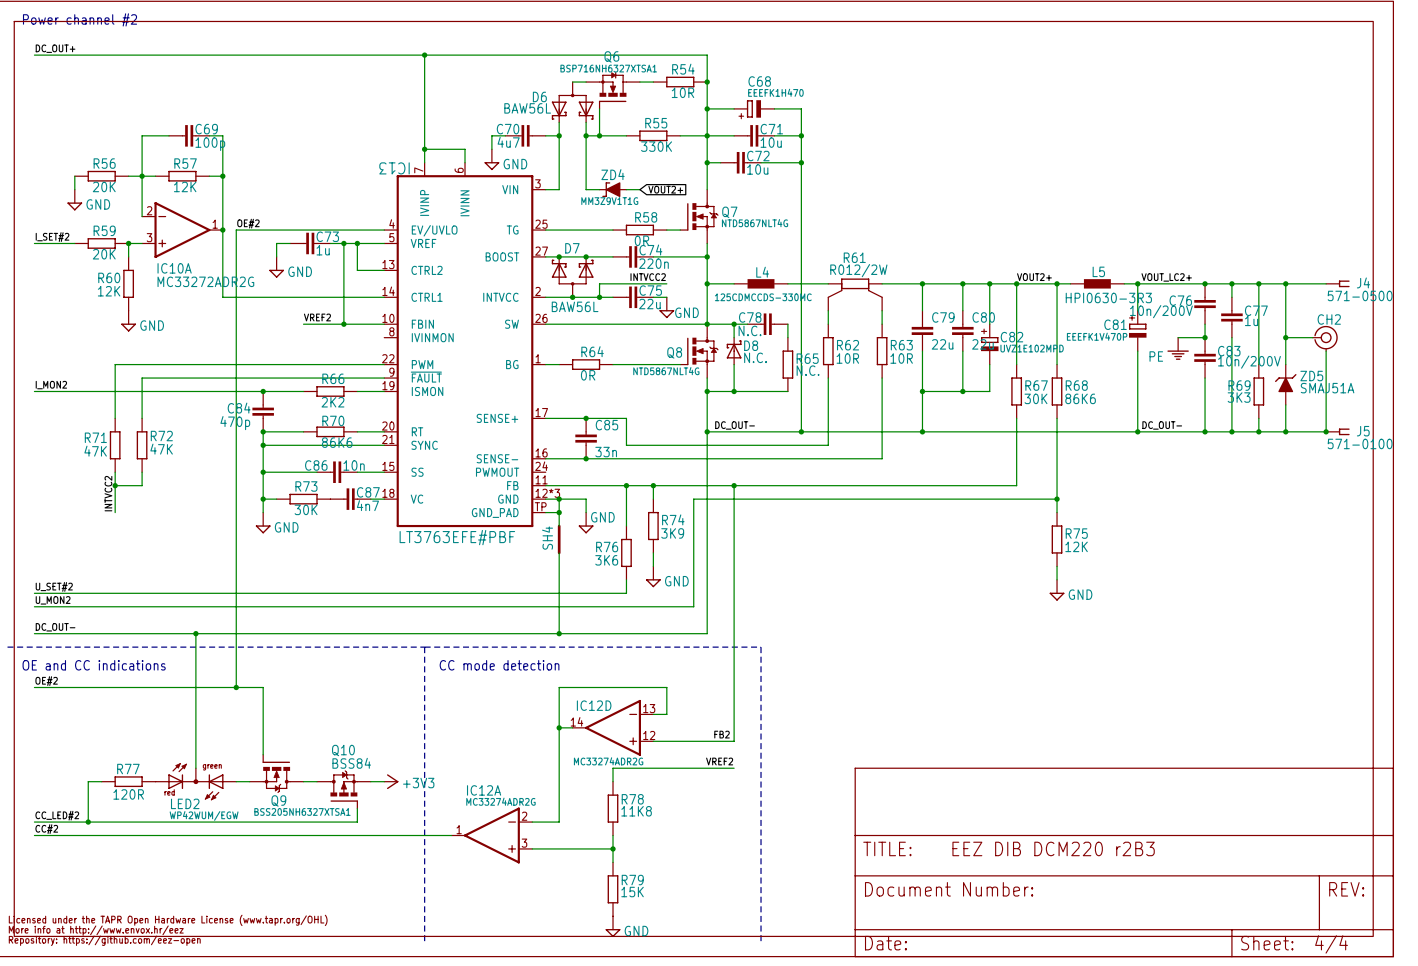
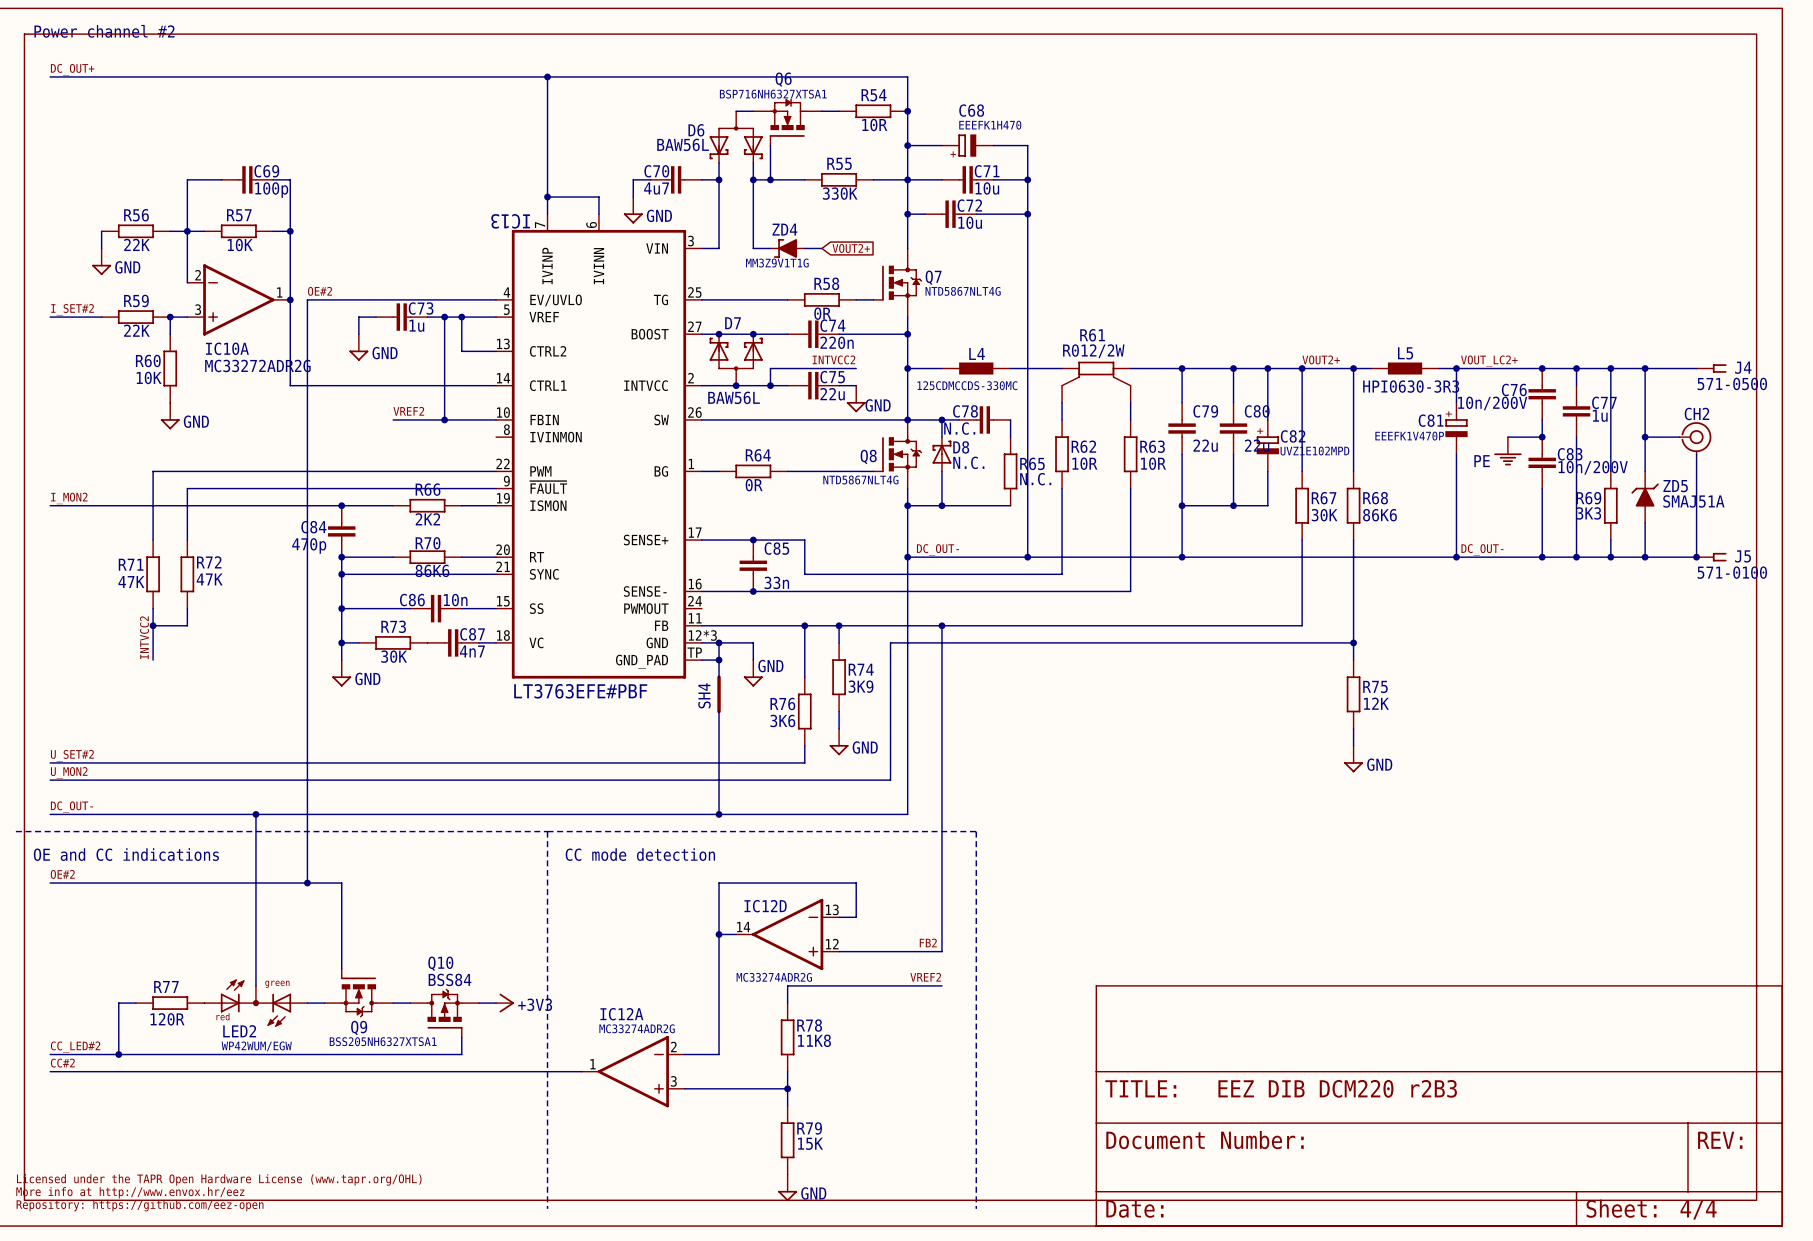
R56 value: 20K (104, 186) -> 22K (136, 244)
R57 value: 12K (185, 186) -> 10K (240, 245)
R59 value: 20K (104, 254) -> 22K (136, 330)
R60 value: 12K (109, 291) -> 10K (149, 377)

